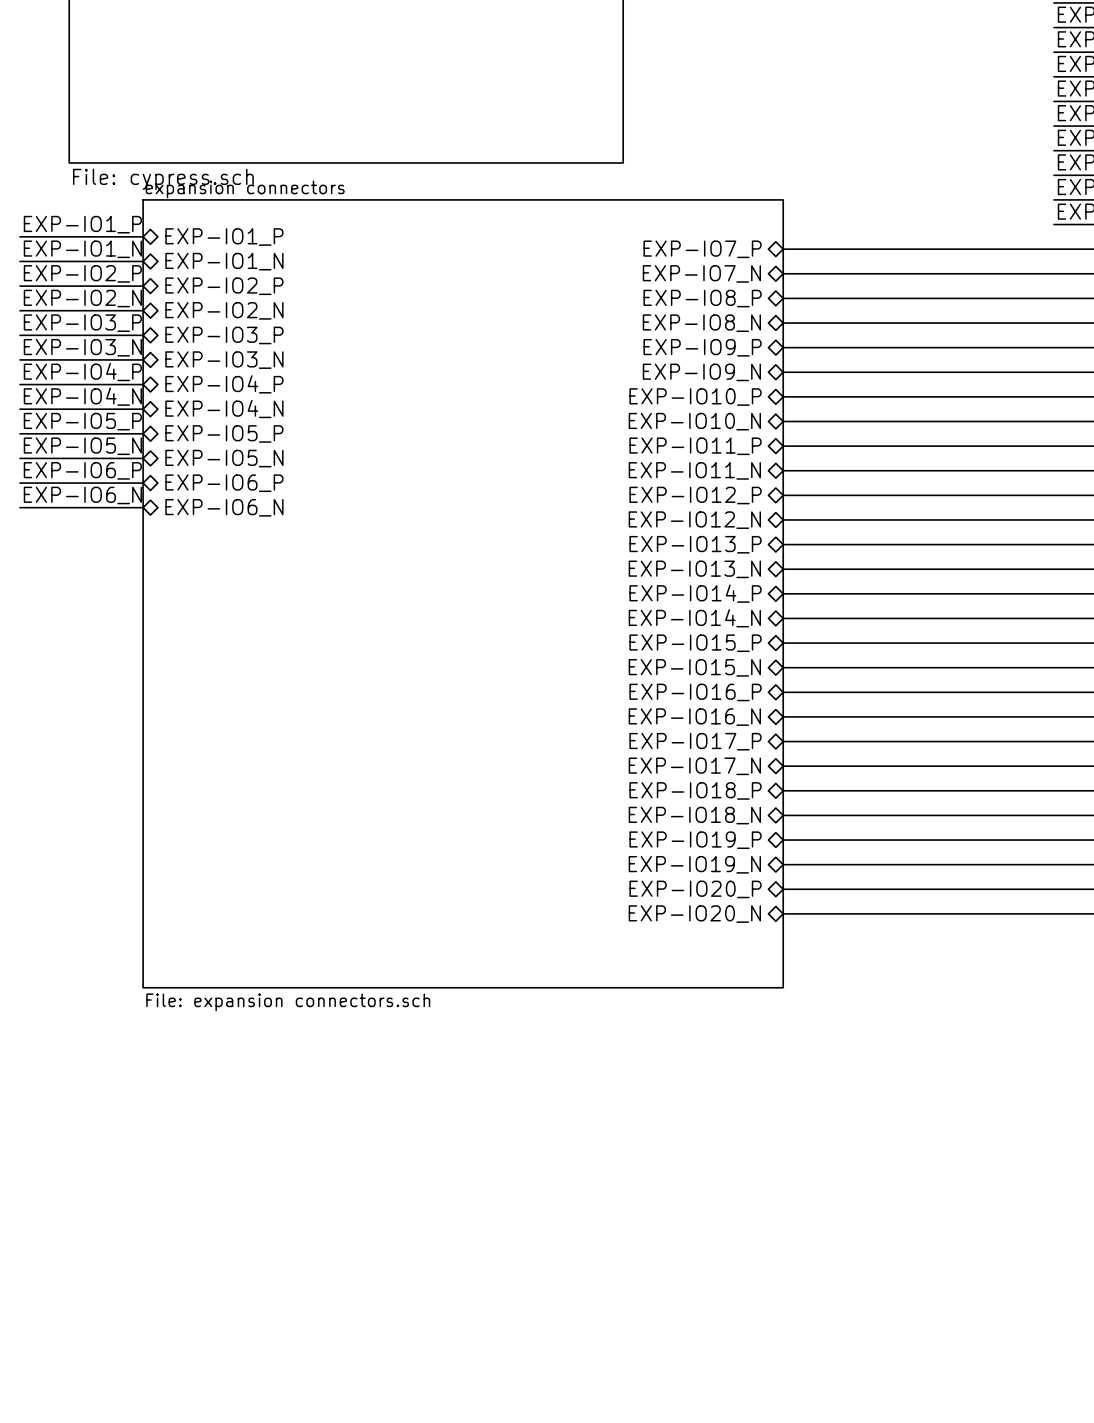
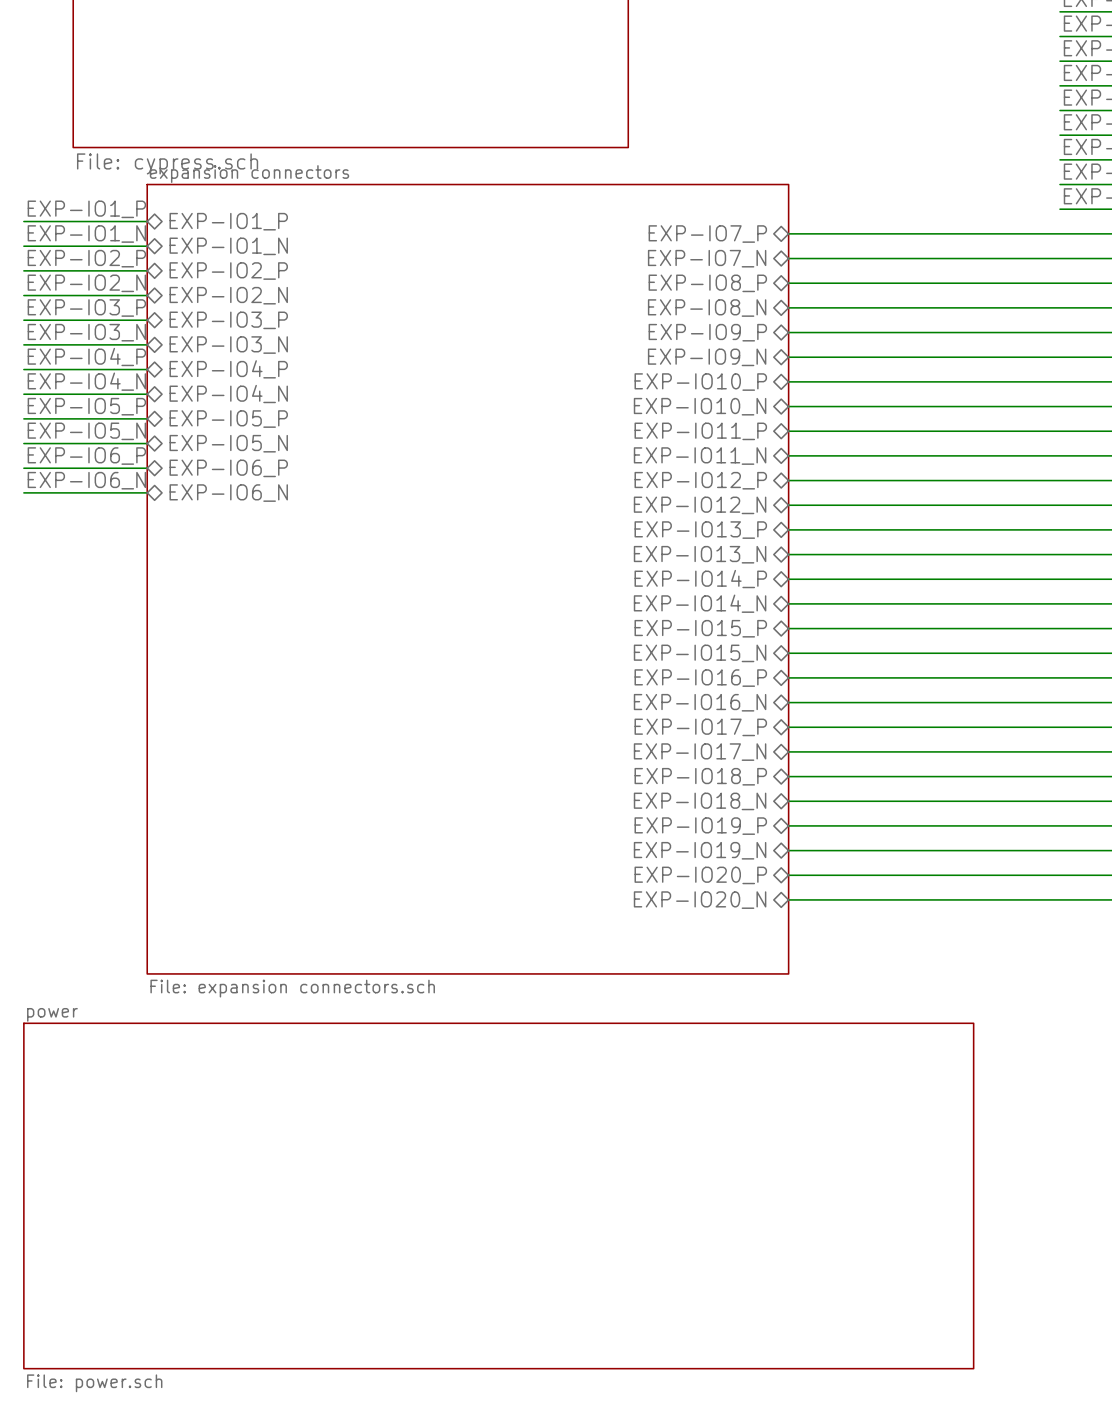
sheet power: none -> File: power.sch (498, 1195)

